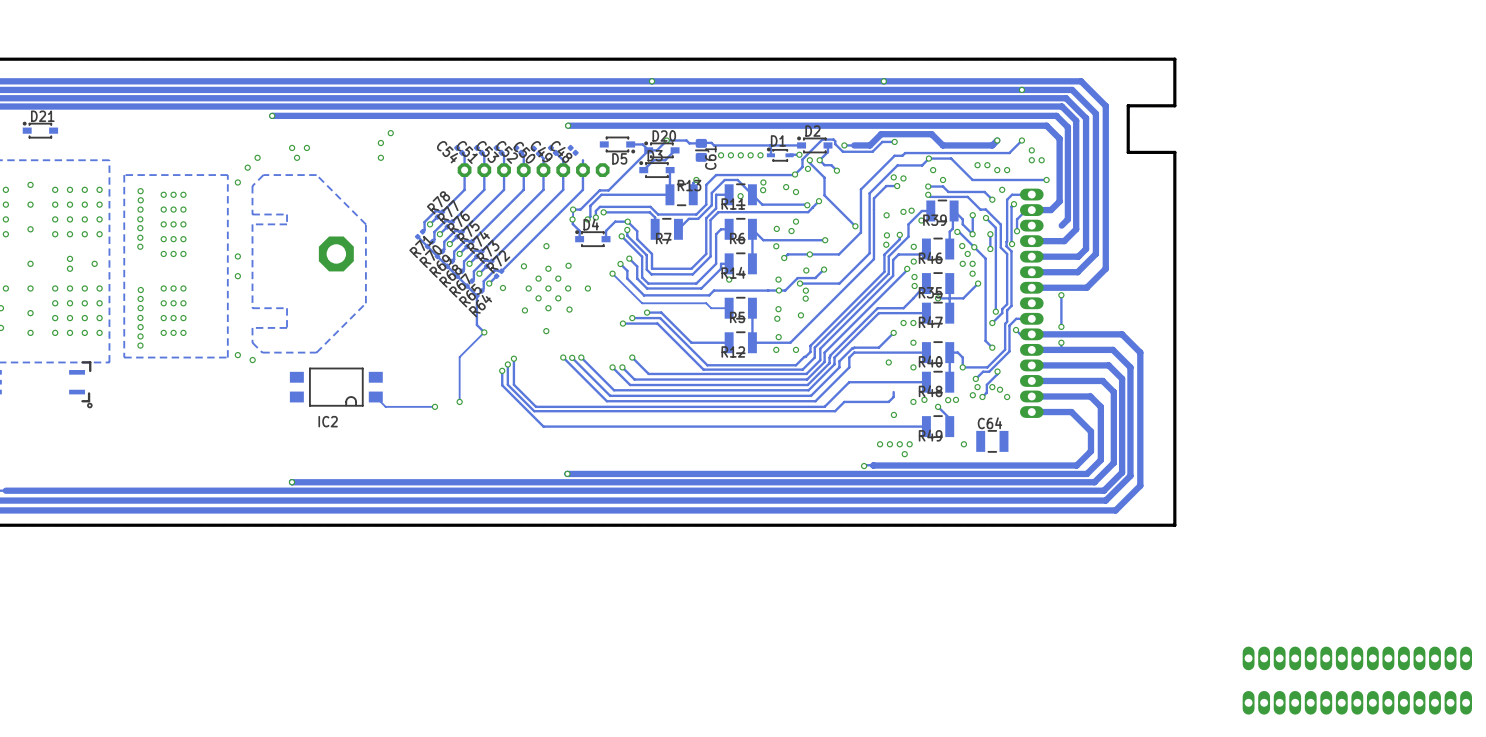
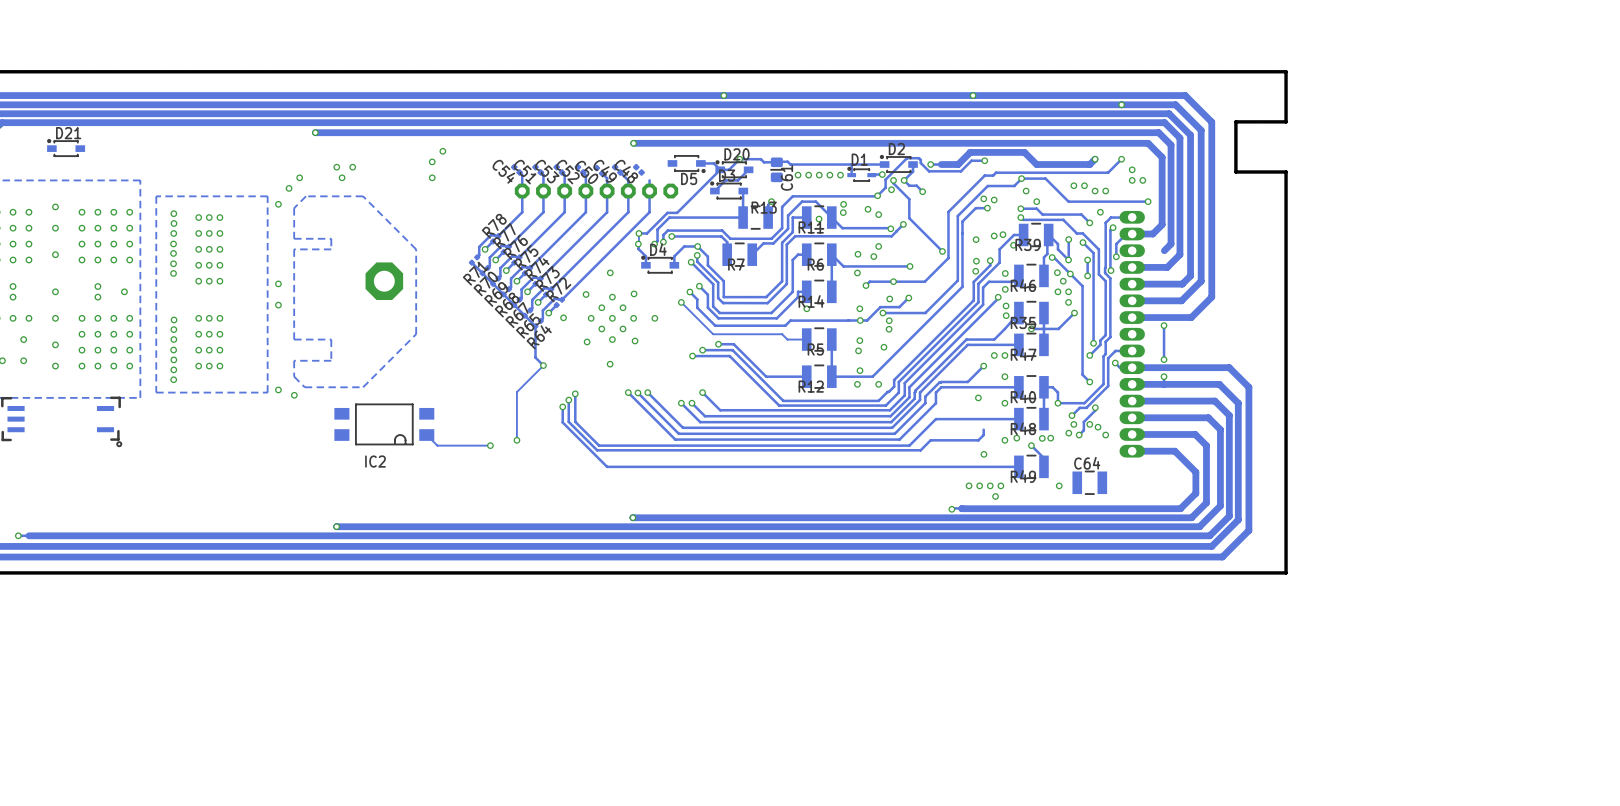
part: (1357, 658) -> none
part: (1357, 702) -> none

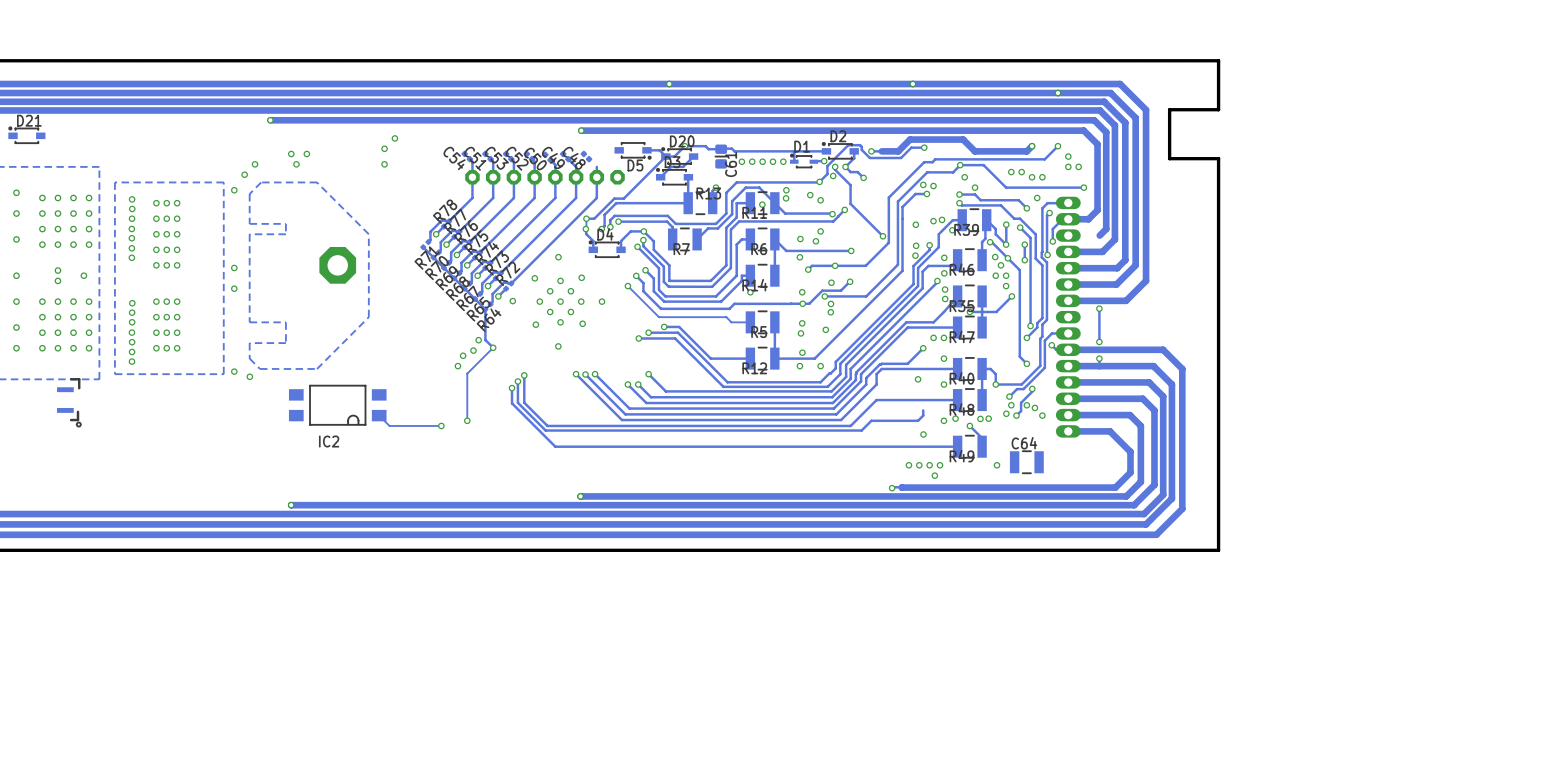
via: none -> (478, 340)
via: none -> (473, 350)
via: none -> (463, 355)
via: none -> (457, 366)

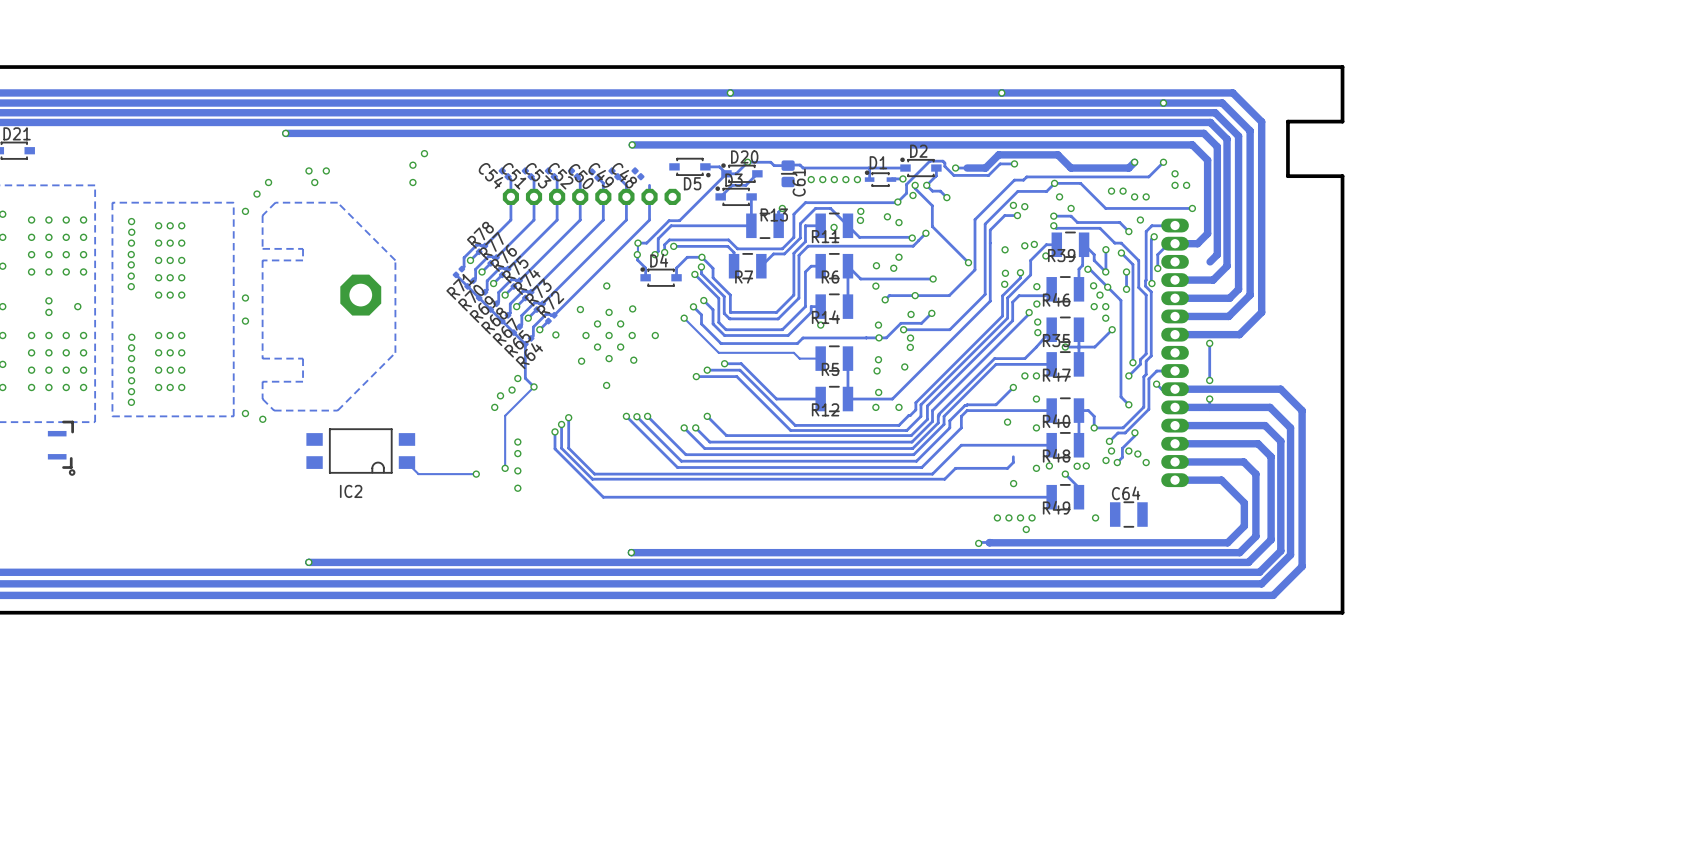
via: none -> (517, 442)
via: none -> (517, 453)
via: none -> (517, 470)
via: none -> (517, 488)

